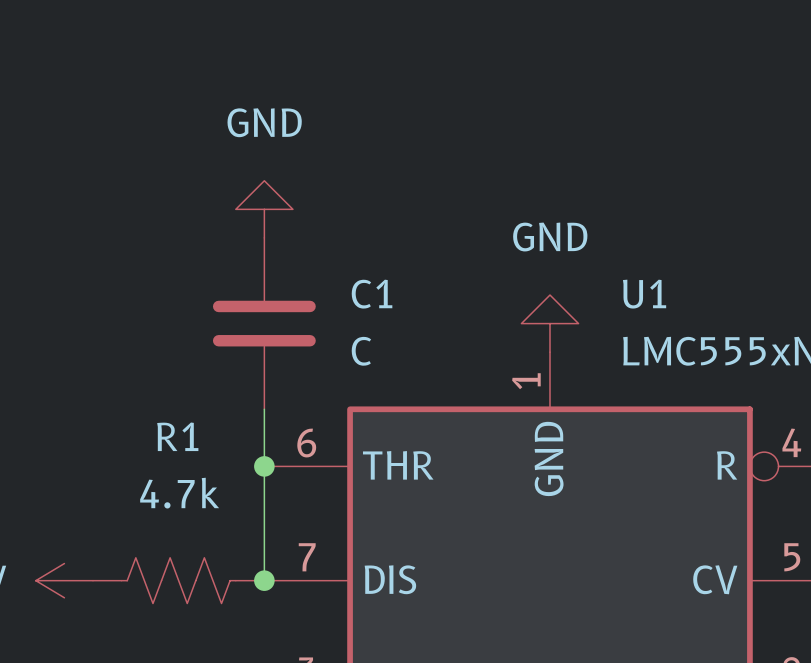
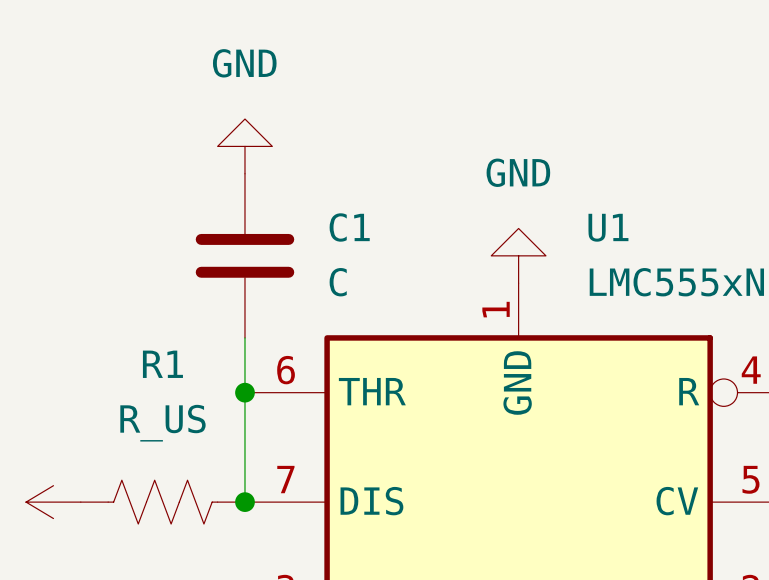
R1 value: 4.7k (179, 493) -> R_US (162, 423)

